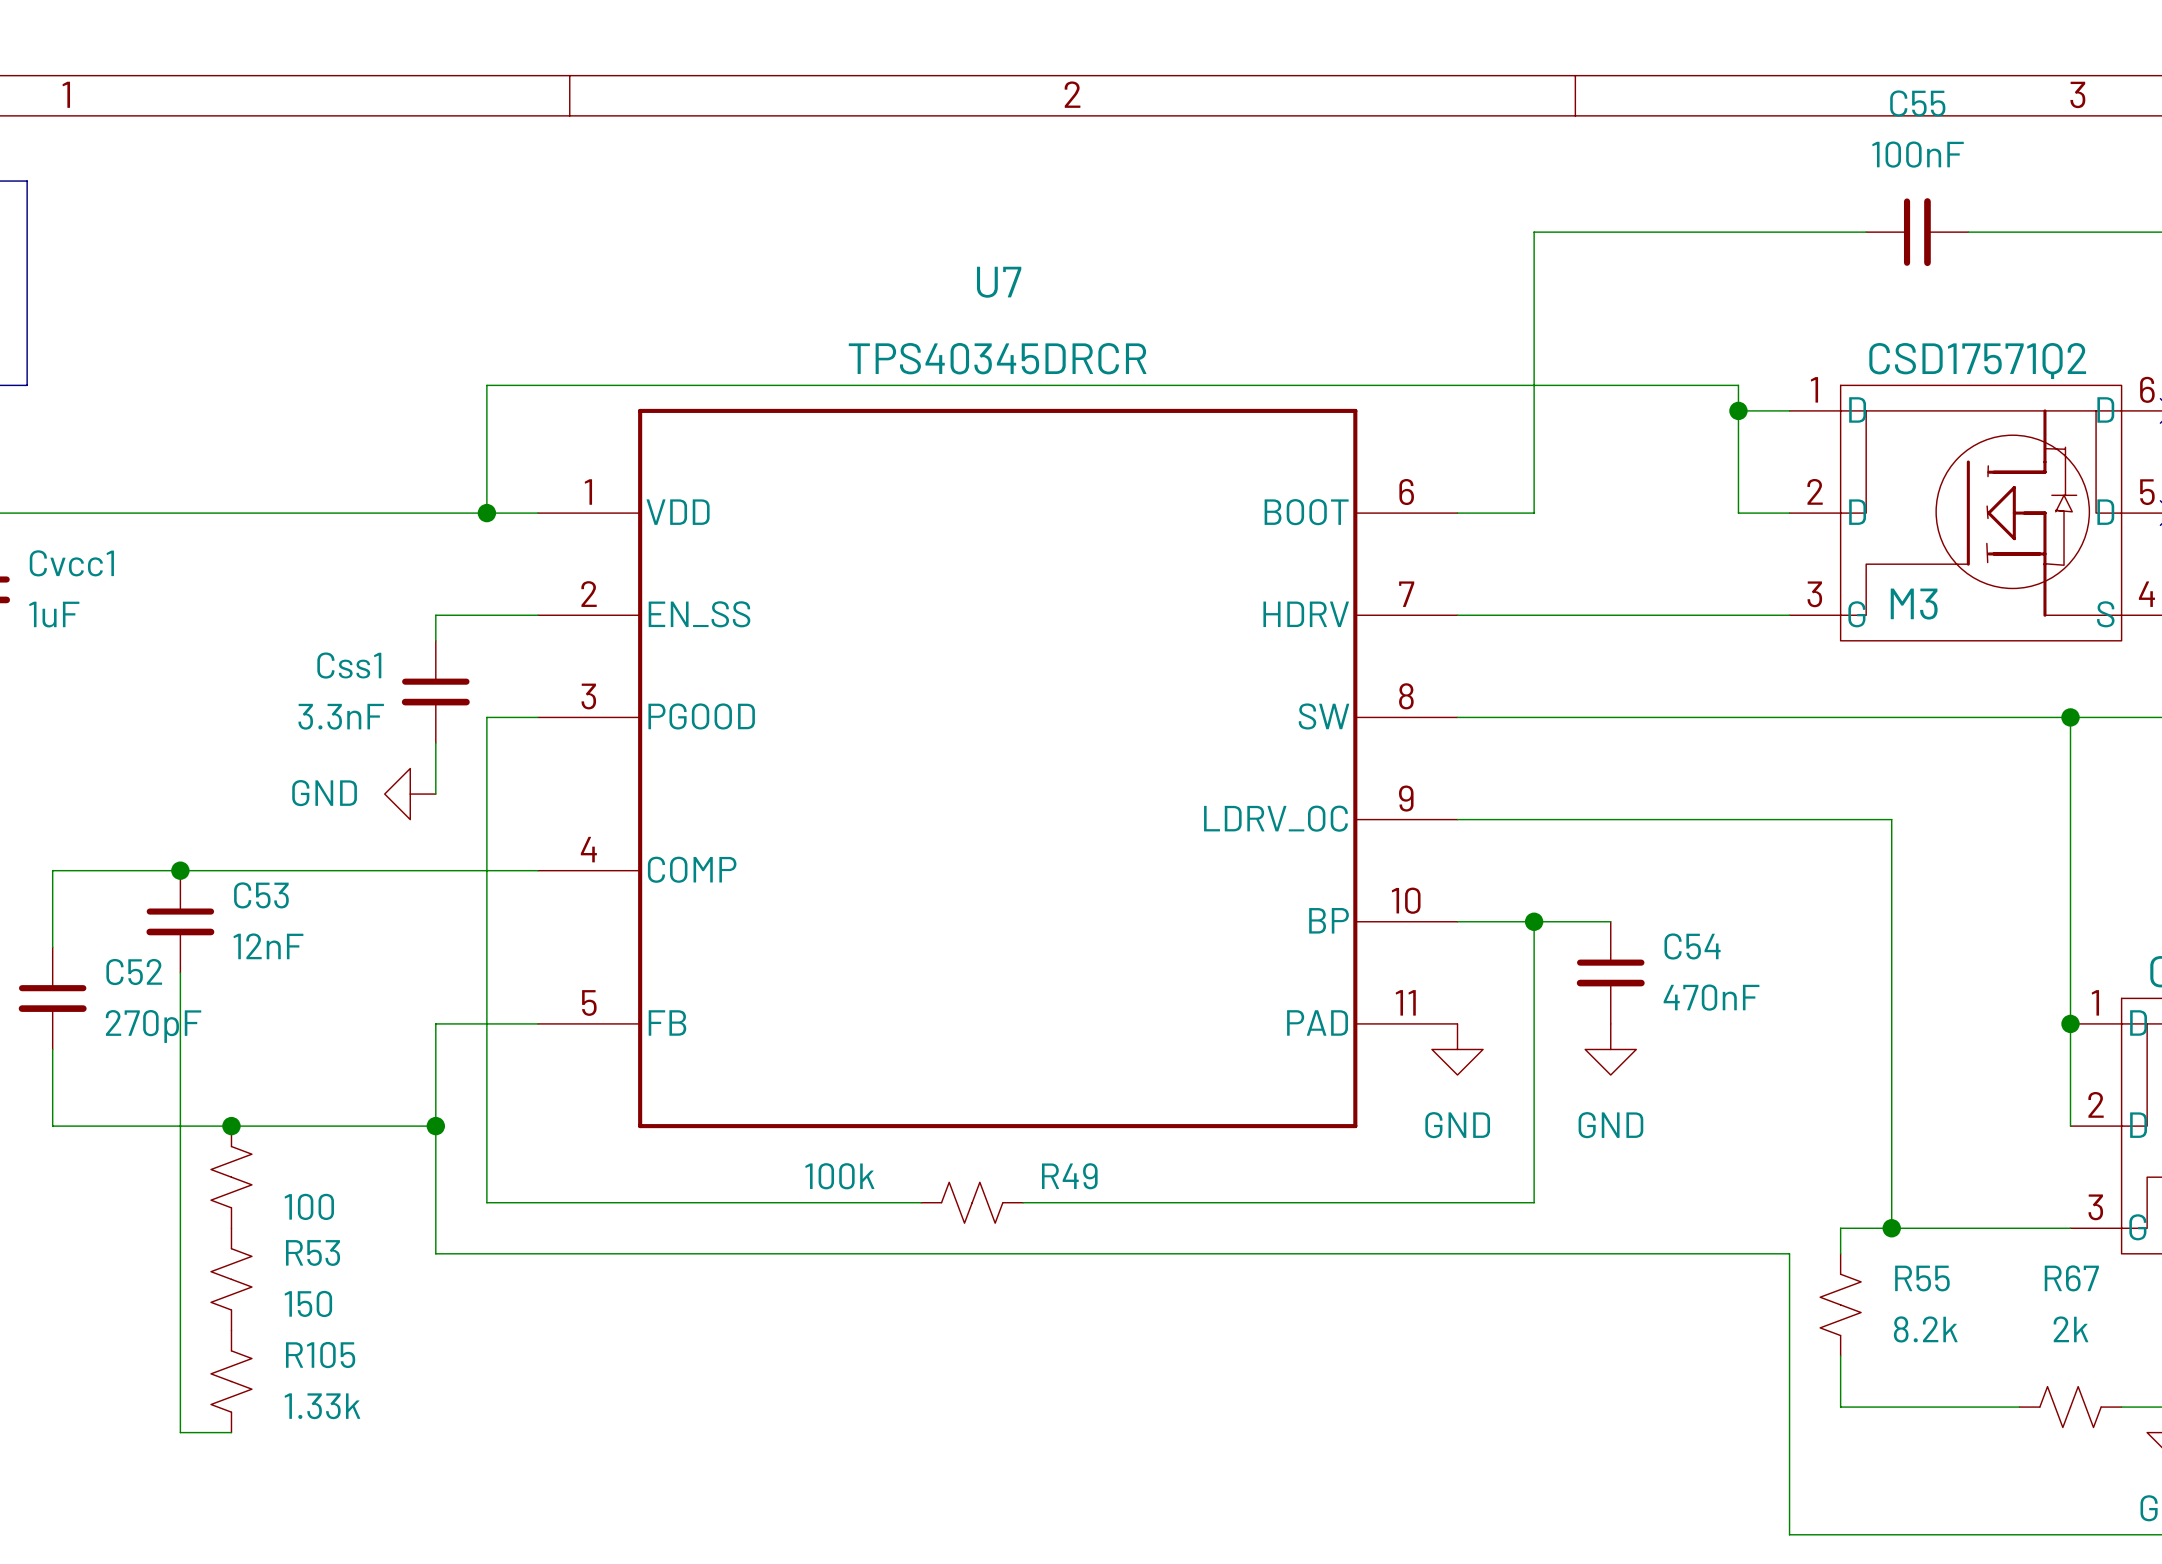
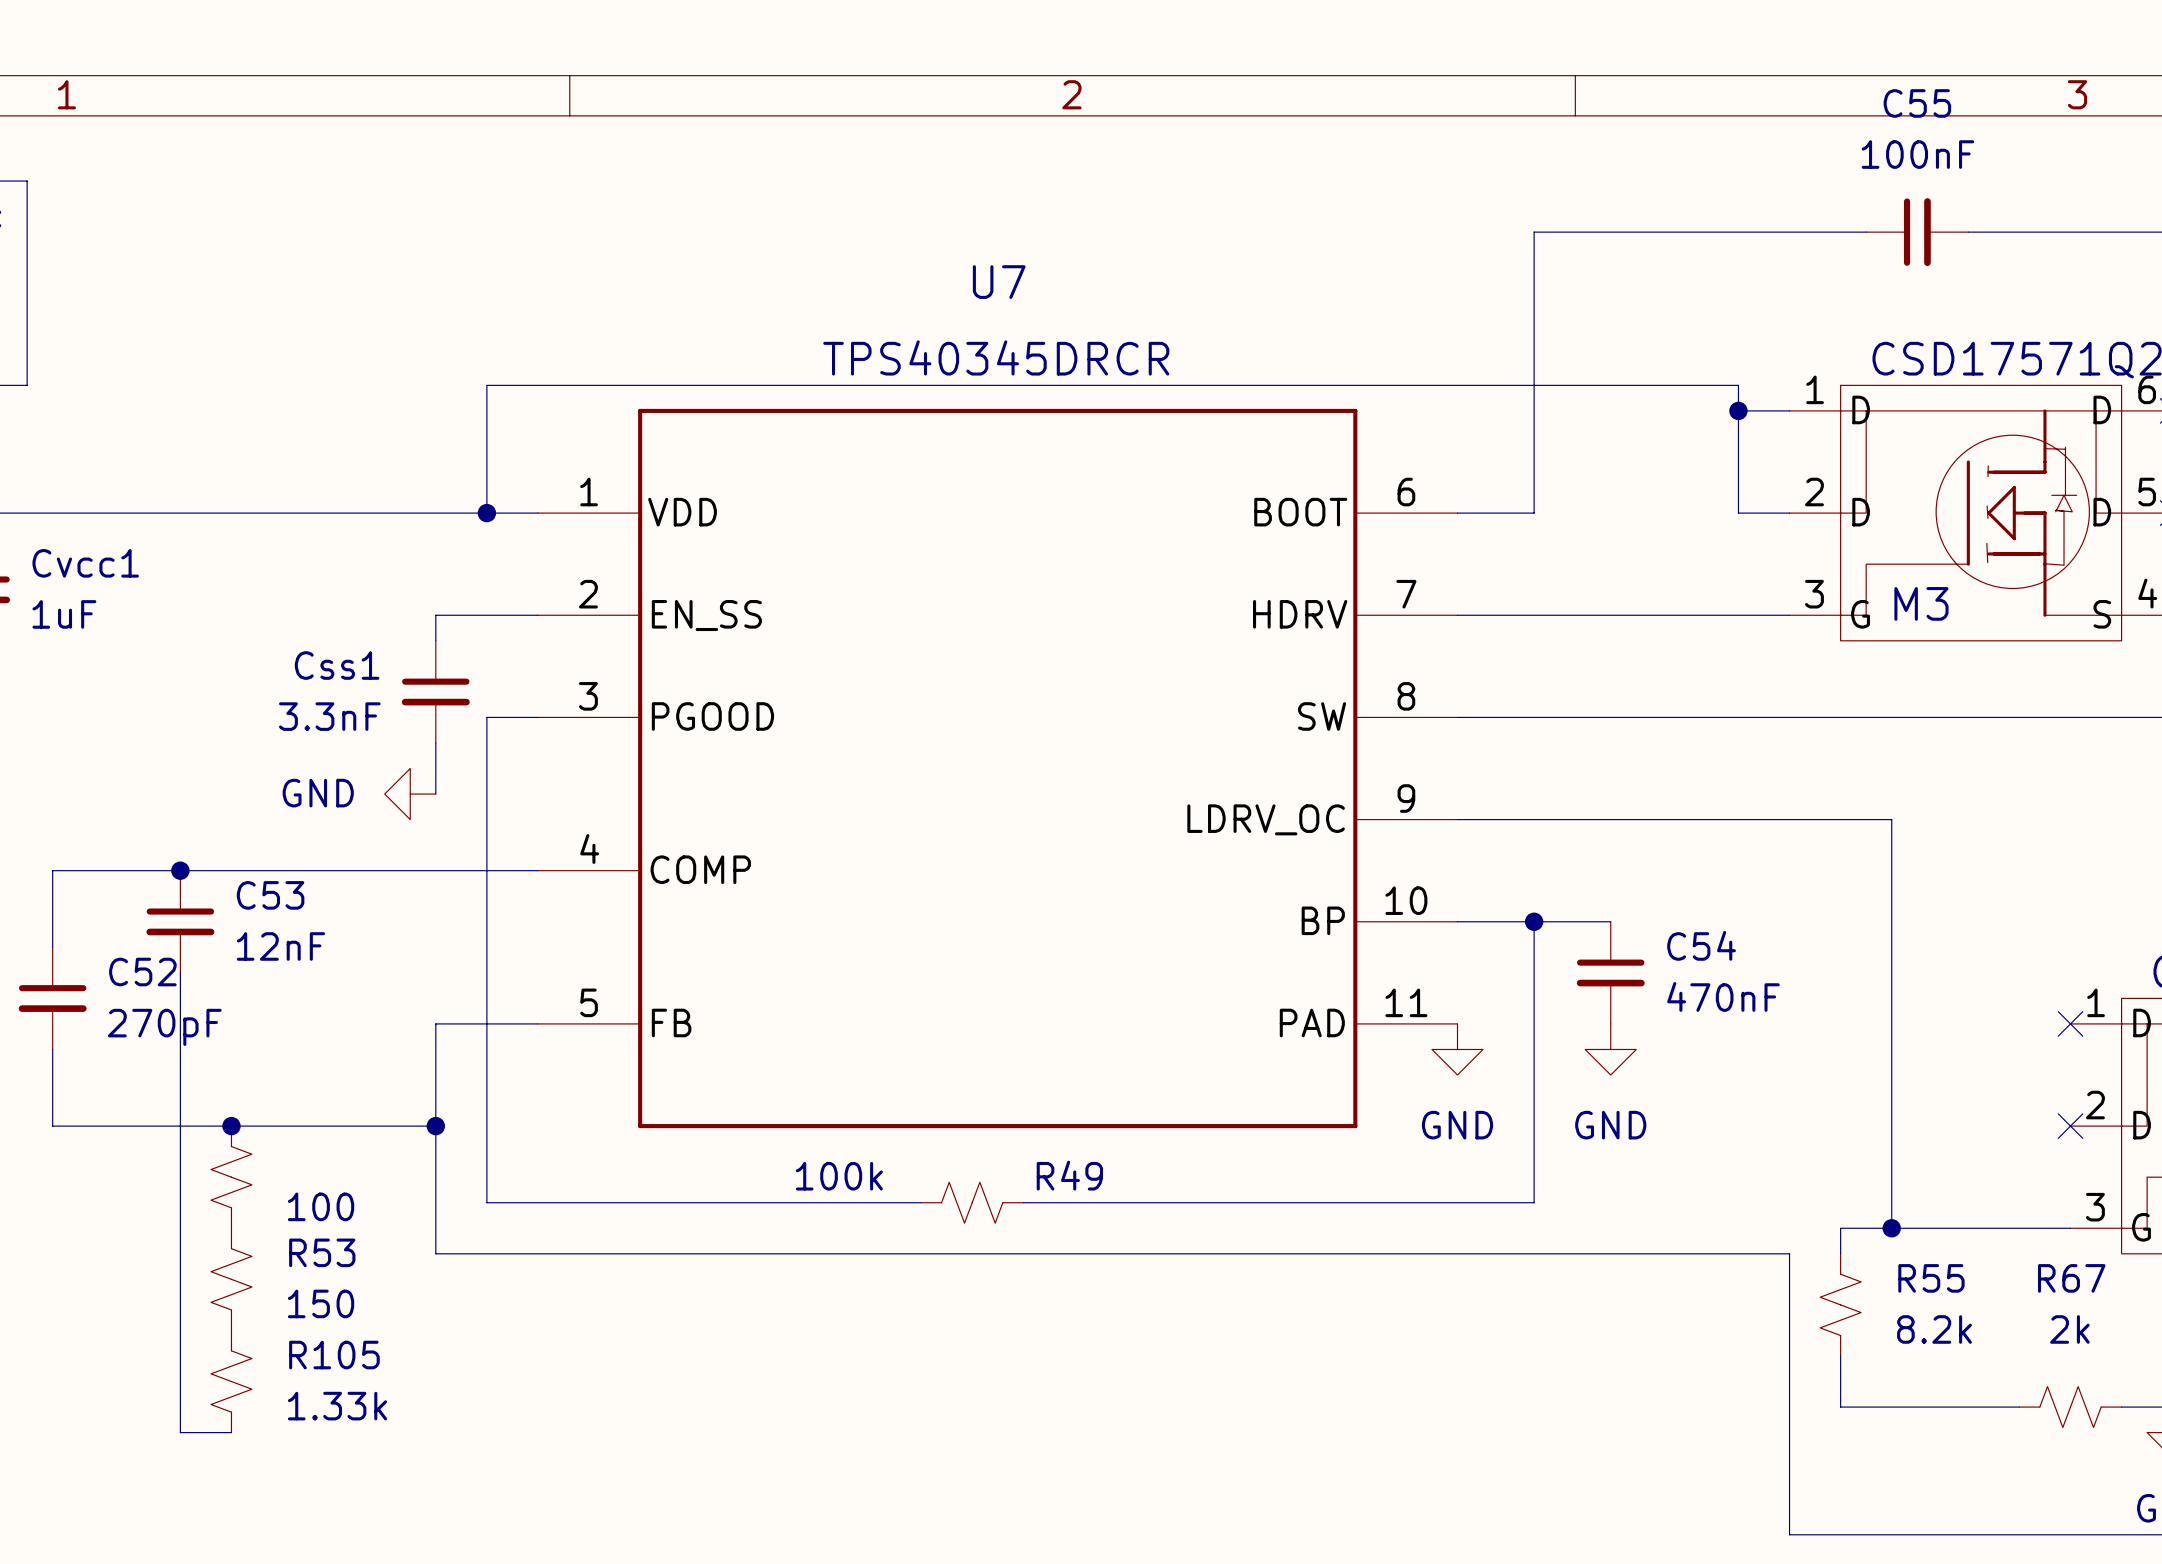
wire: (2070, 717) (2070, 1126) -> none
junction: (2070, 717) -> none
junction: (2070, 1023) -> none
no-connect mark: none -> (2070, 1023)
no-connect mark: none -> (2070, 1126)

